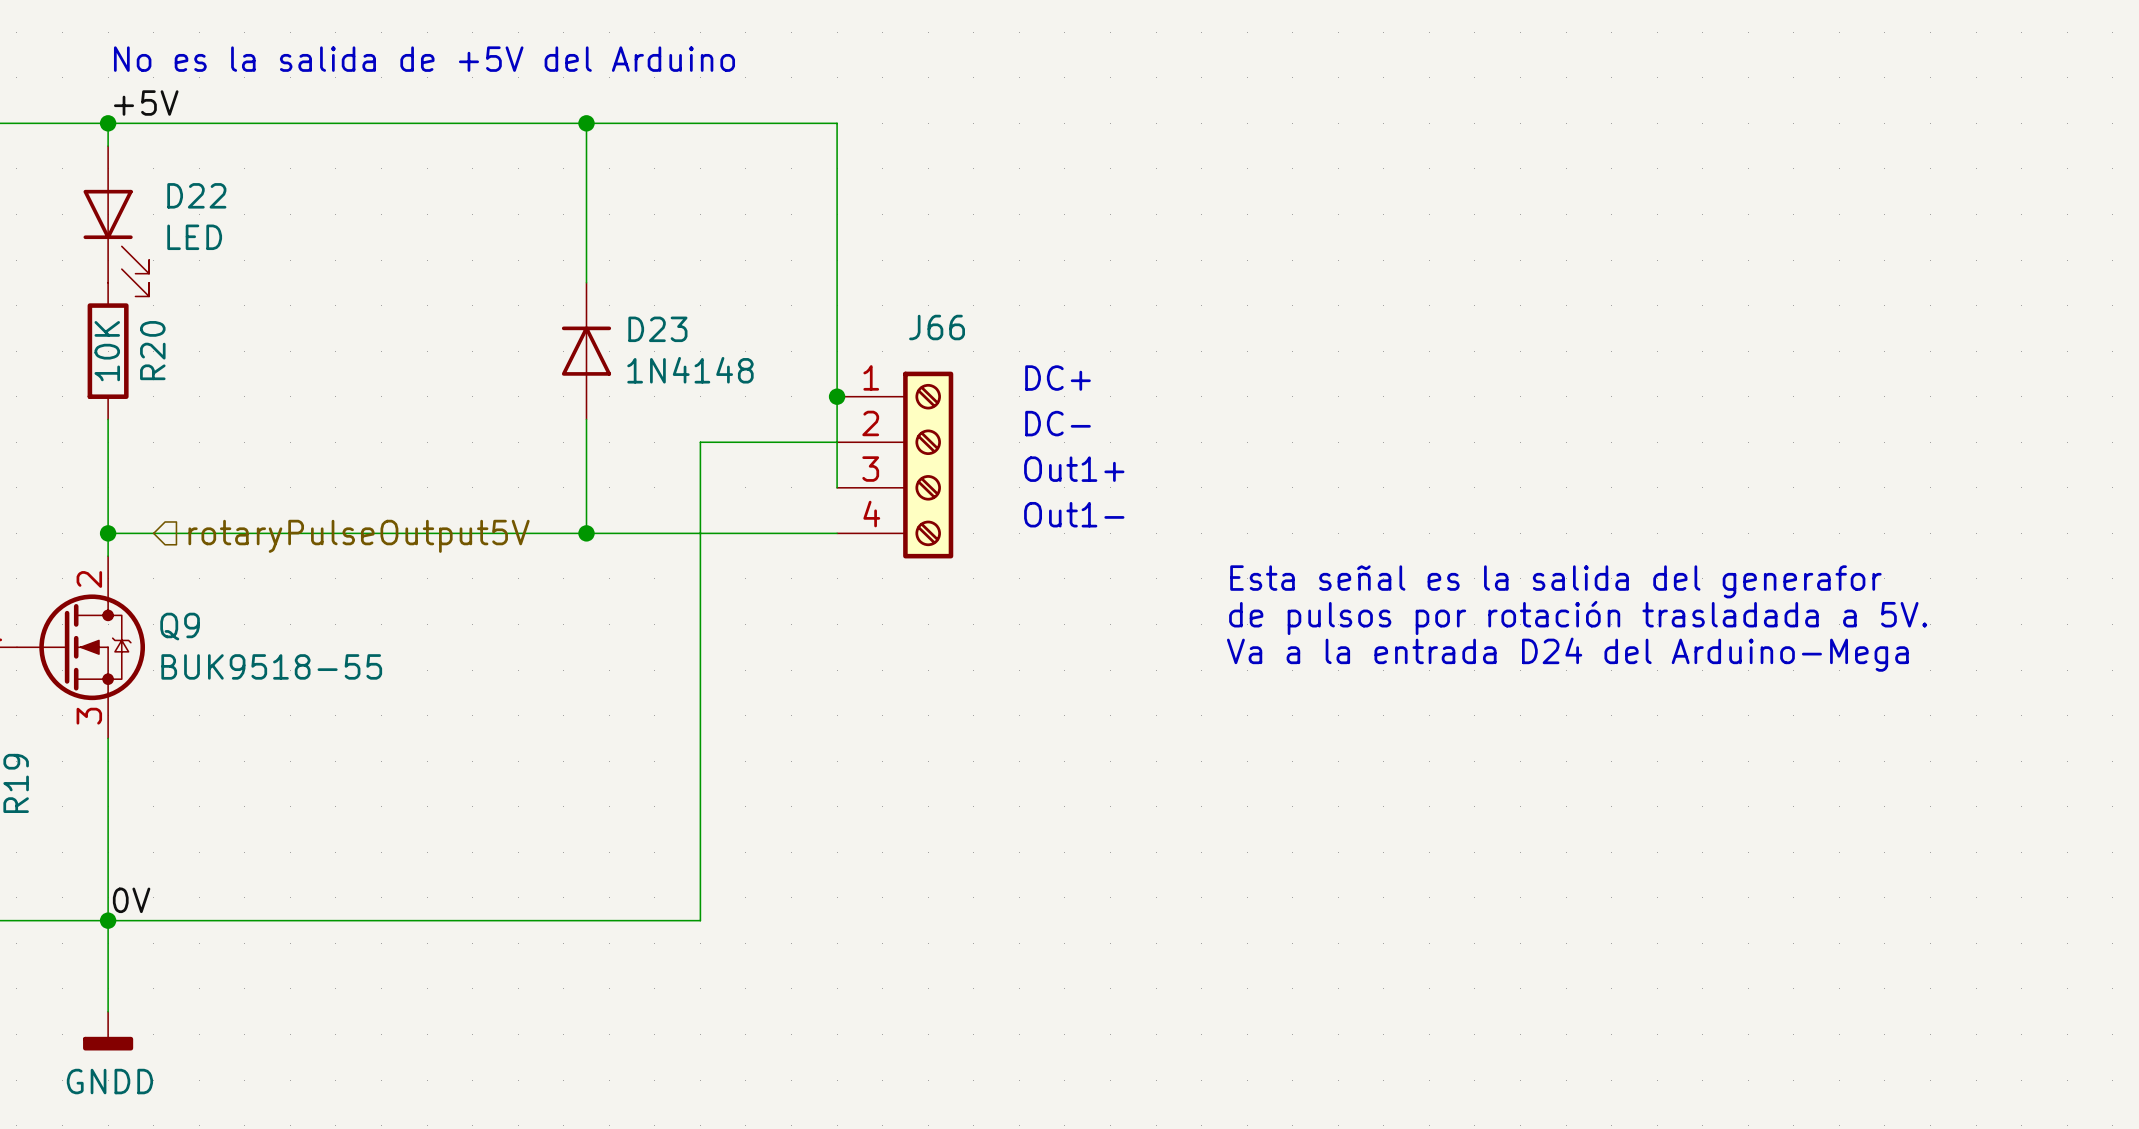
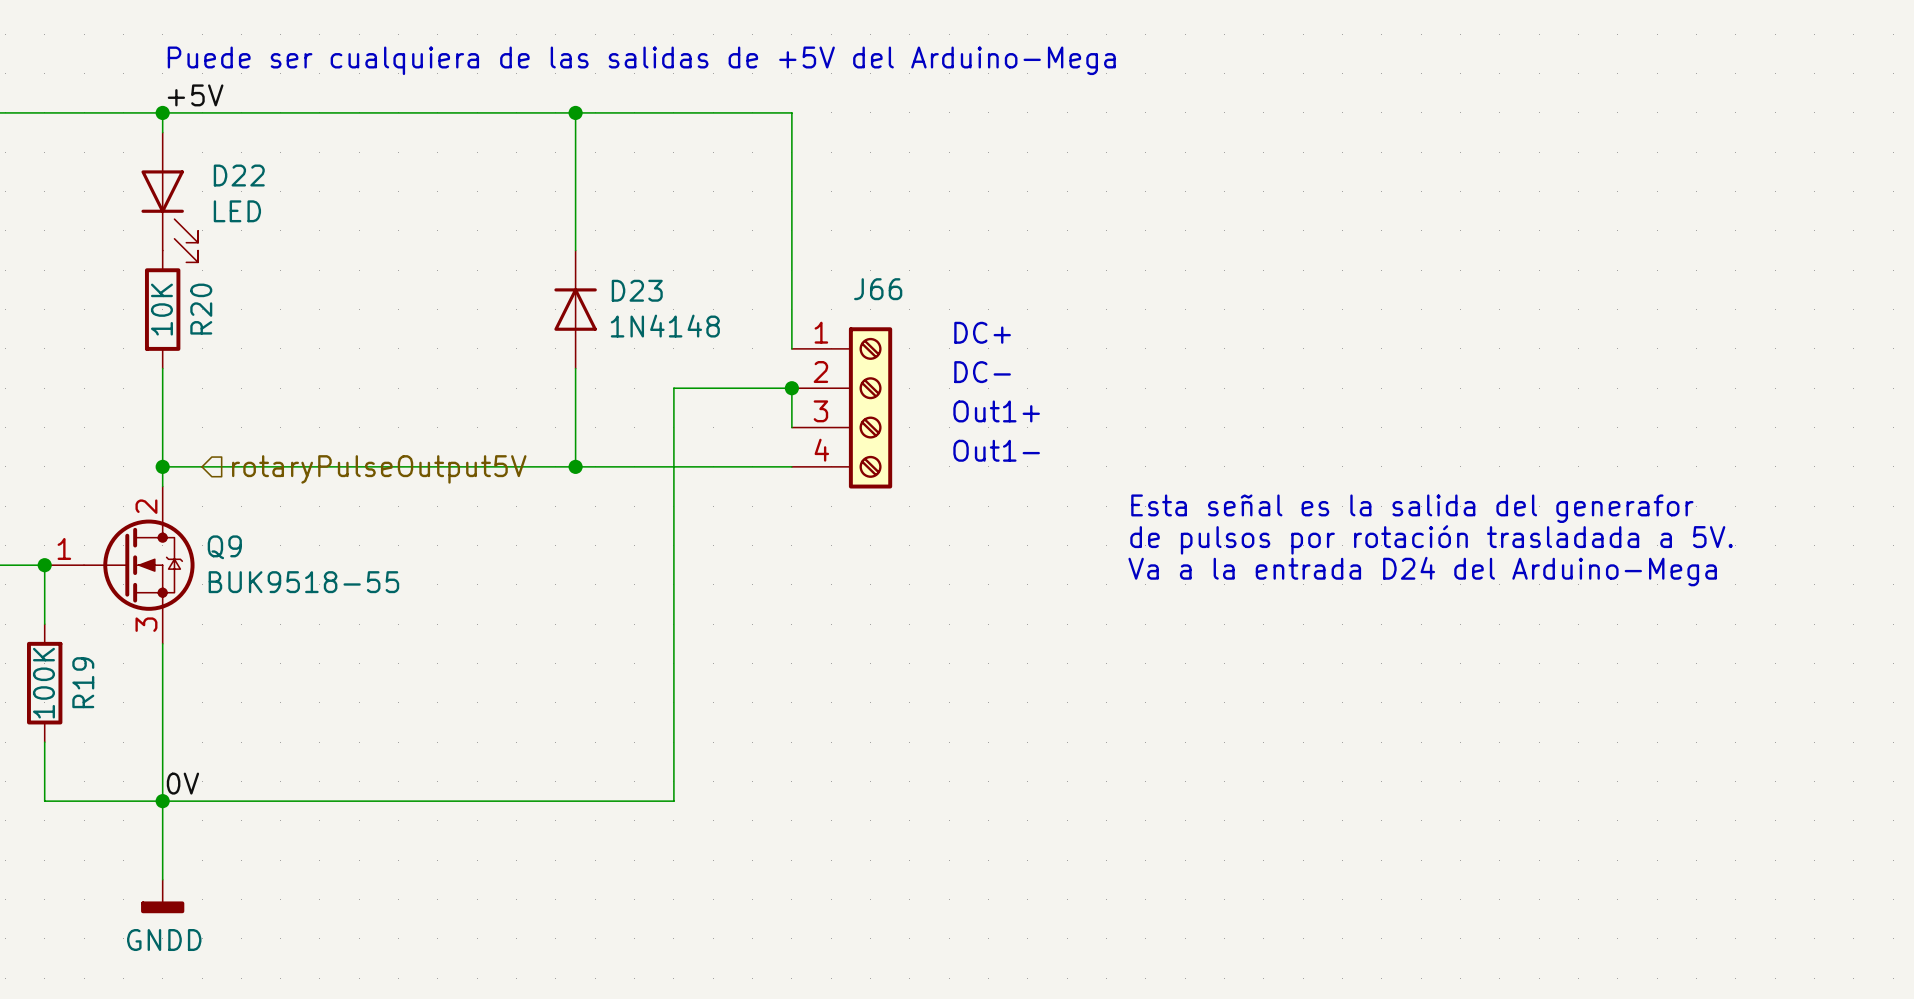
text: No es la salida de +5V del Arduino (424, 59) -> Puede ser cualquiera de las salidas de +5V del Arduino-Mega (641, 60)
wire: (837, 396) (837, 442) -> none
junction position: (837, 396) -> (791, 388)

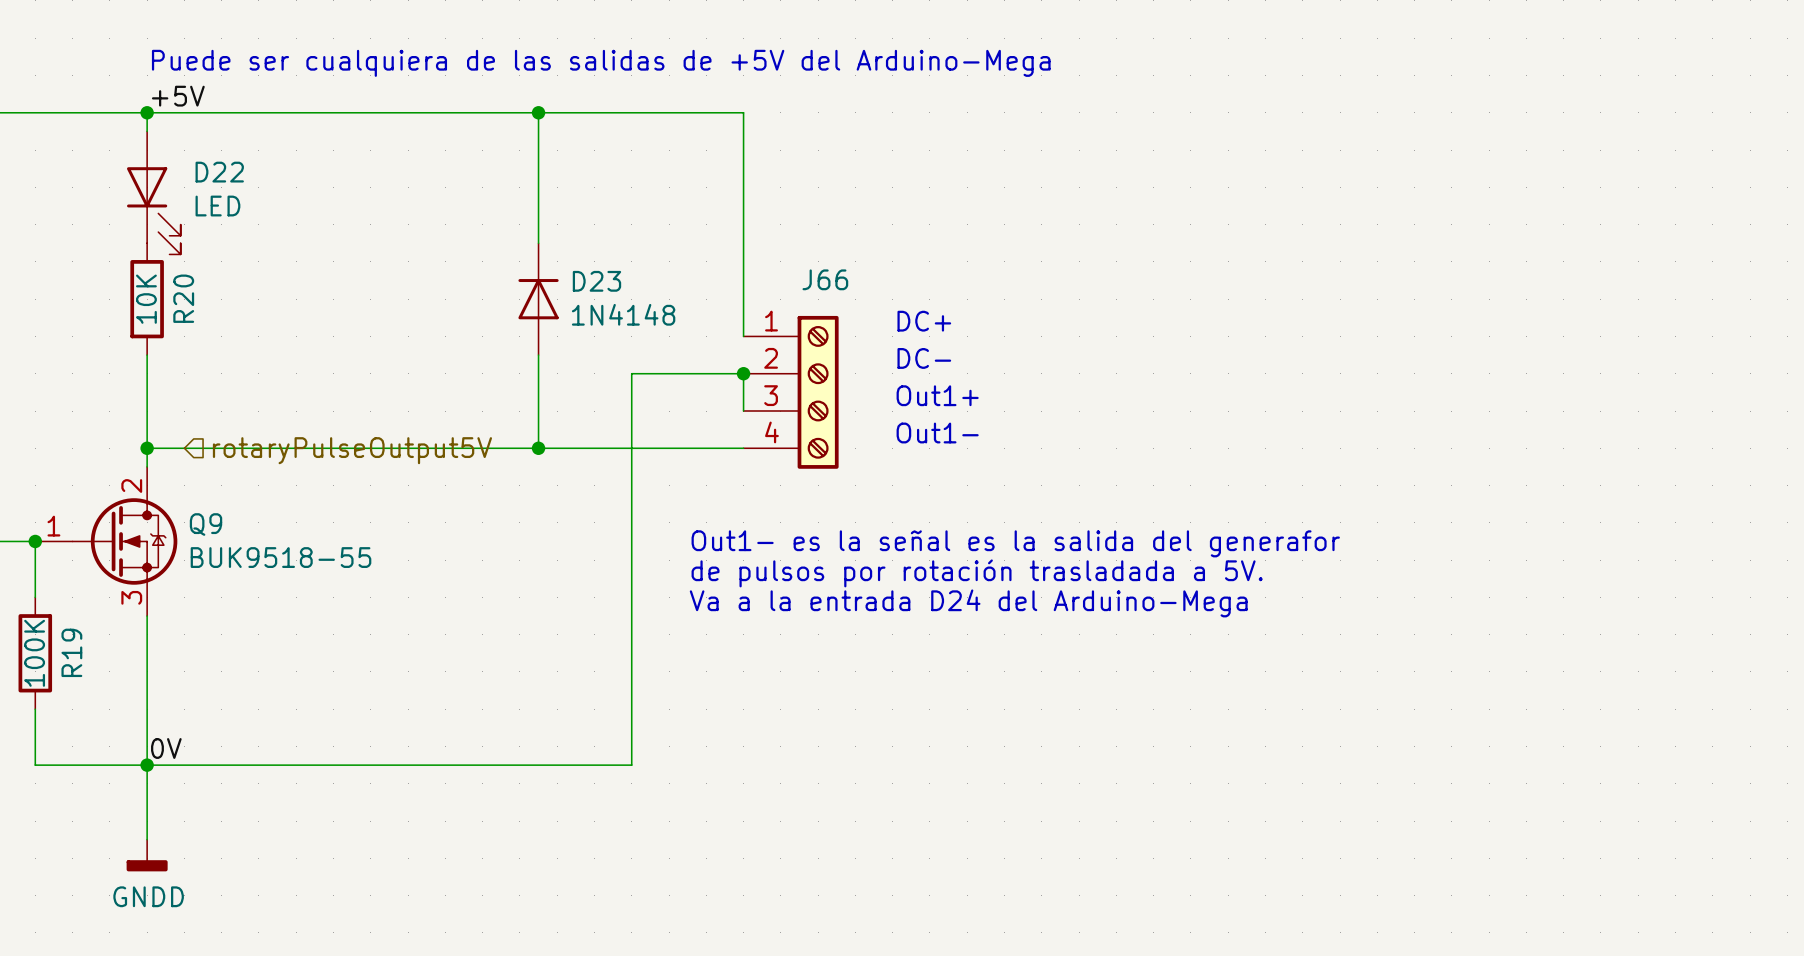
text: Esta señal es la salida del generafor (1412, 508) -> none
text: de pulsos por rotación trasladada a 5V. (1431, 539) -> none
text: none -> Out1- es la señal es la salida del generafor (1015, 543)
text: Va a la entrada D24 del Arduino-Mega (1422, 571) -> none
text: none -> de pulsos por rotación trasladada a 5V. (977, 573)
text: none -> Va a la entrada D24 del Arduino-Mega (968, 603)

